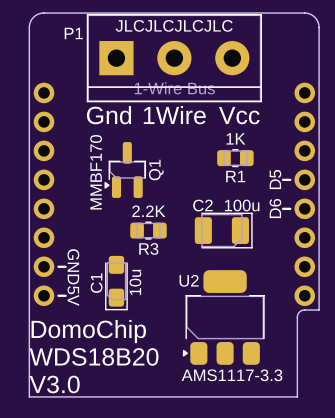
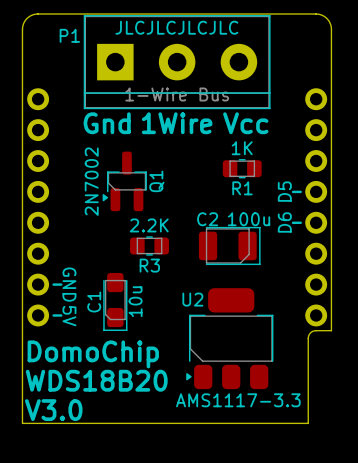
Q1 value: MMBF170 (96, 172) -> 2N7002 (91, 181)

